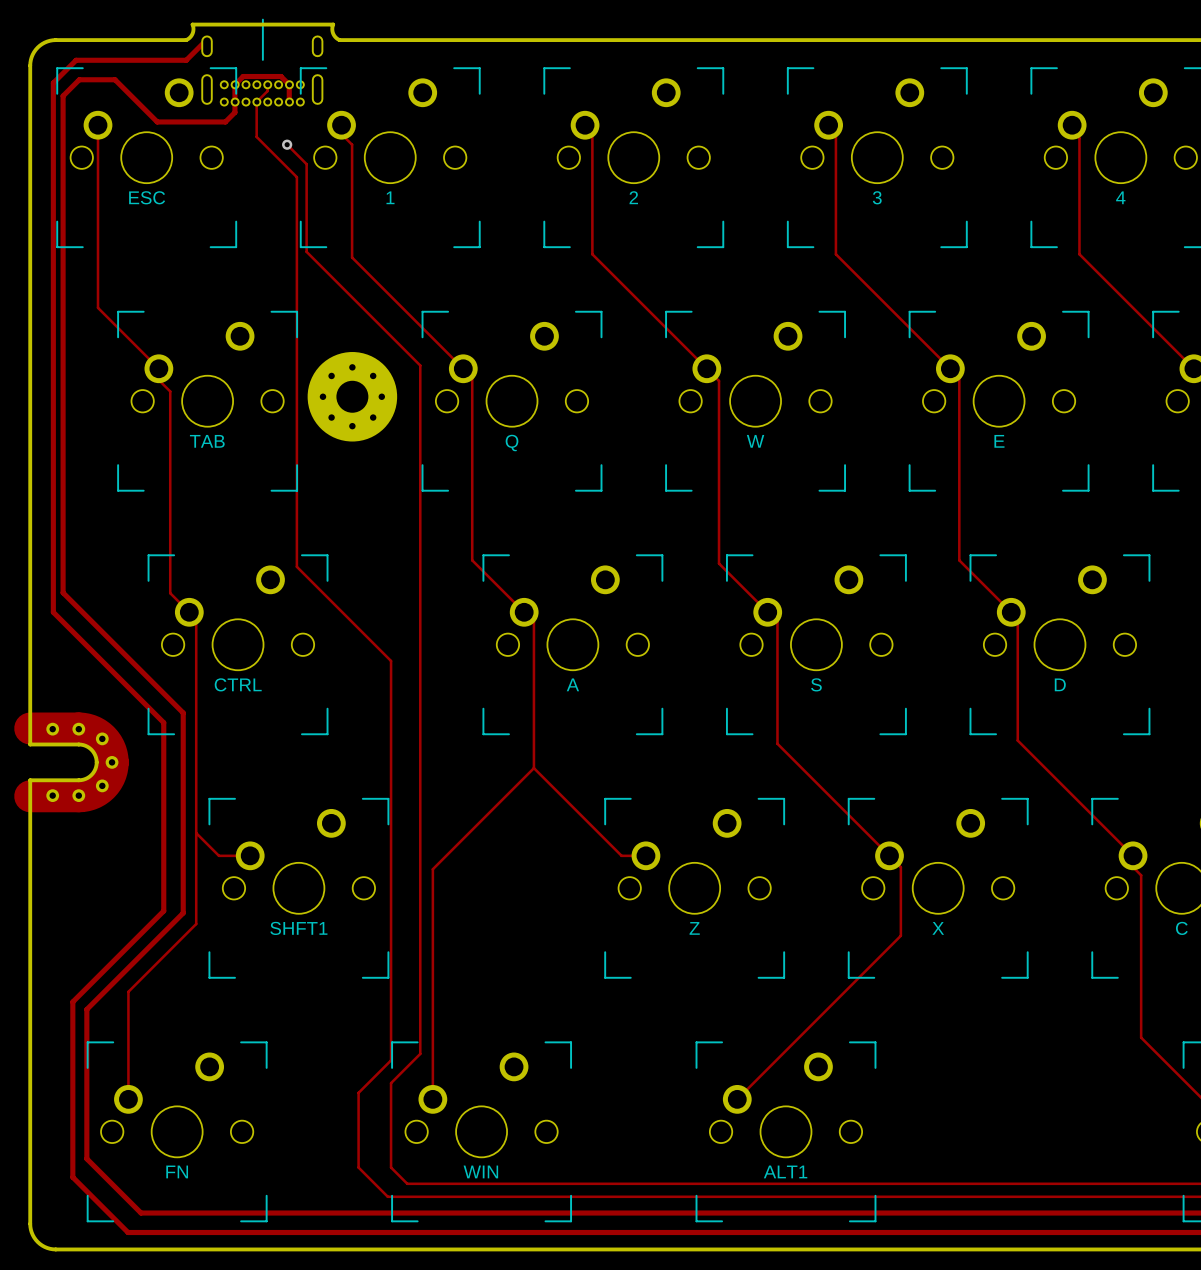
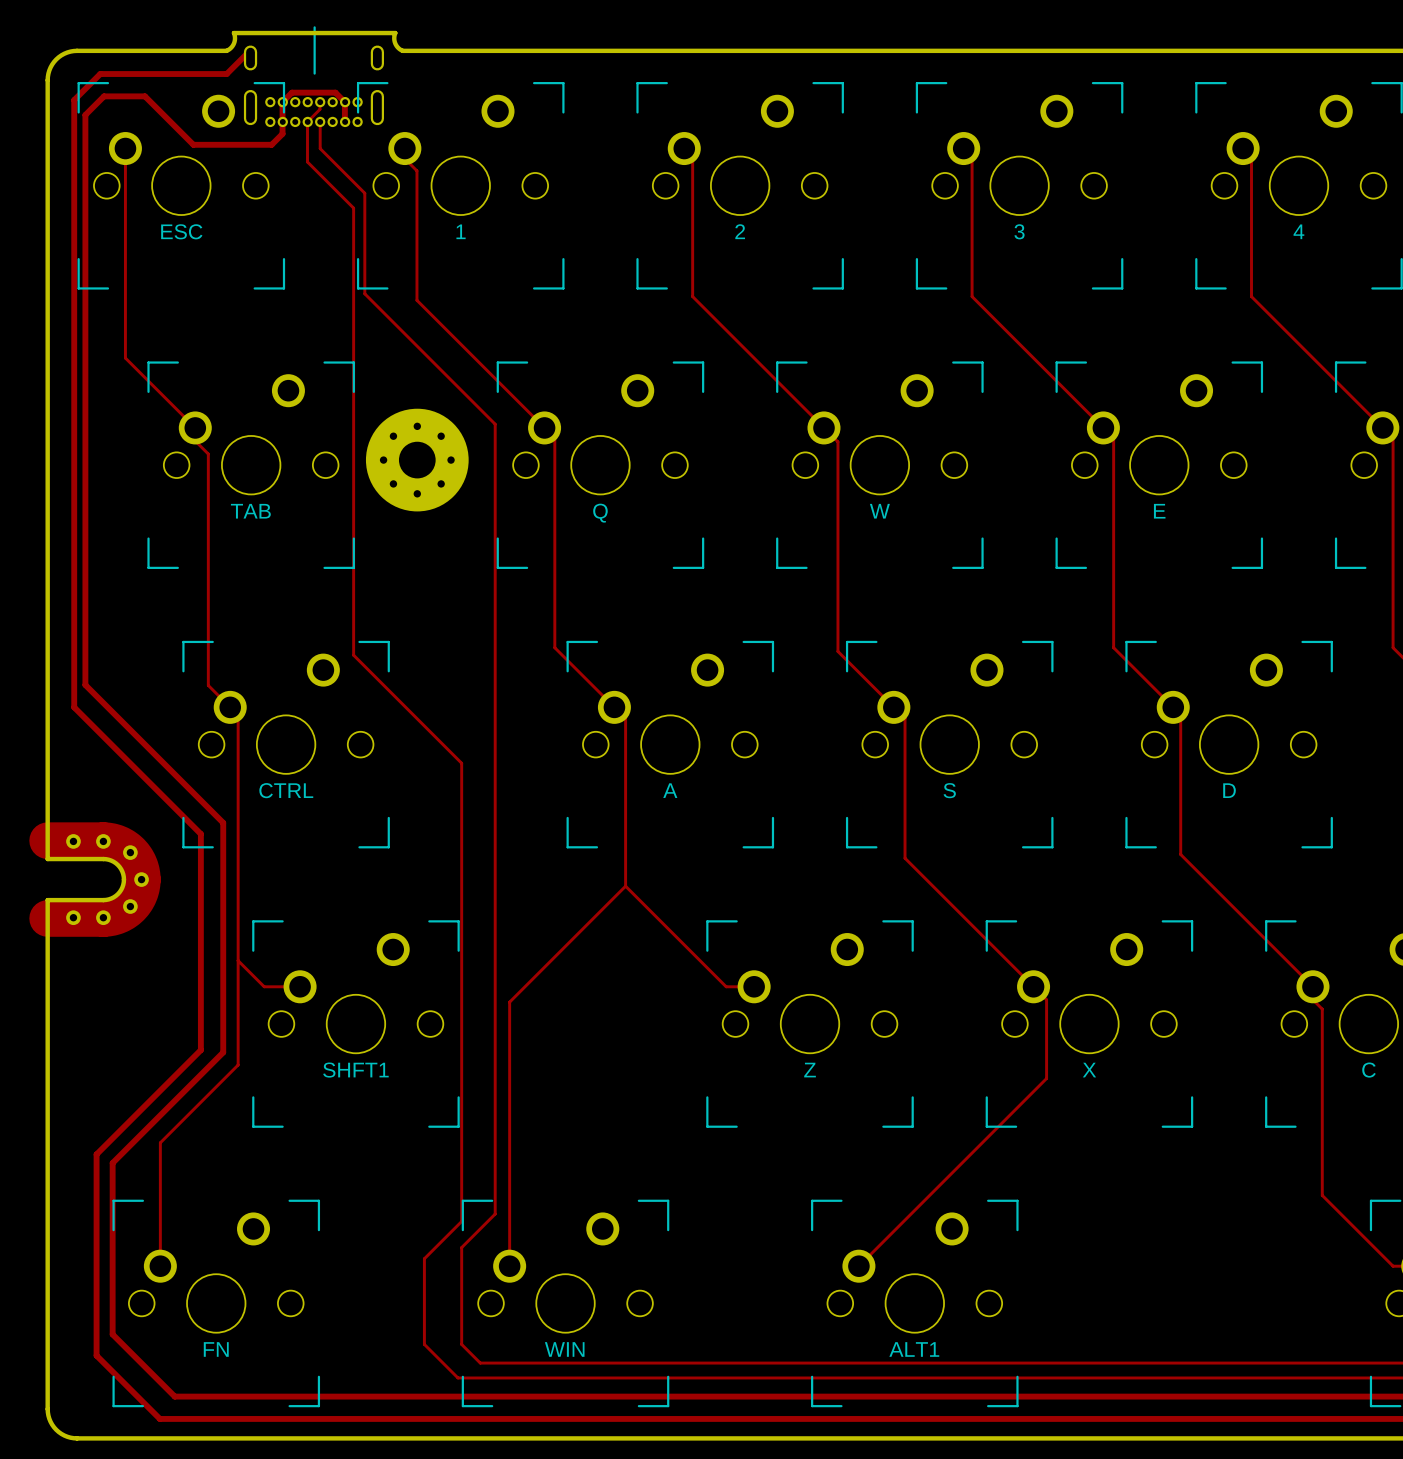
track: none -> (320, 121) (320, 148) (342, 170)
via: (287, 144) -> none

